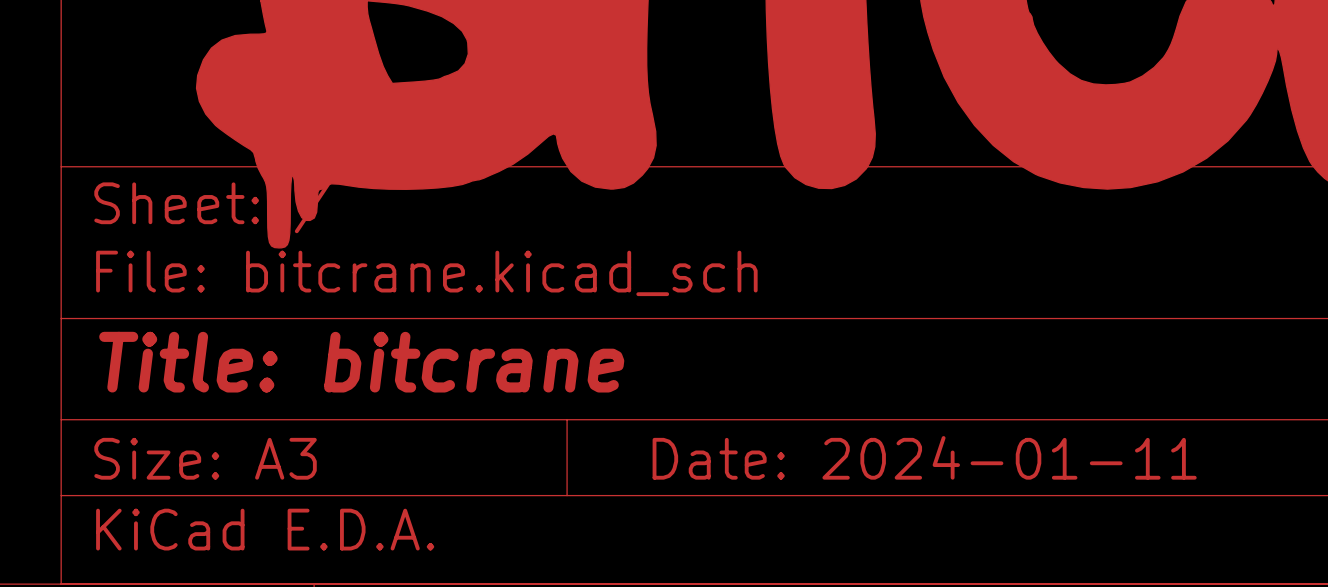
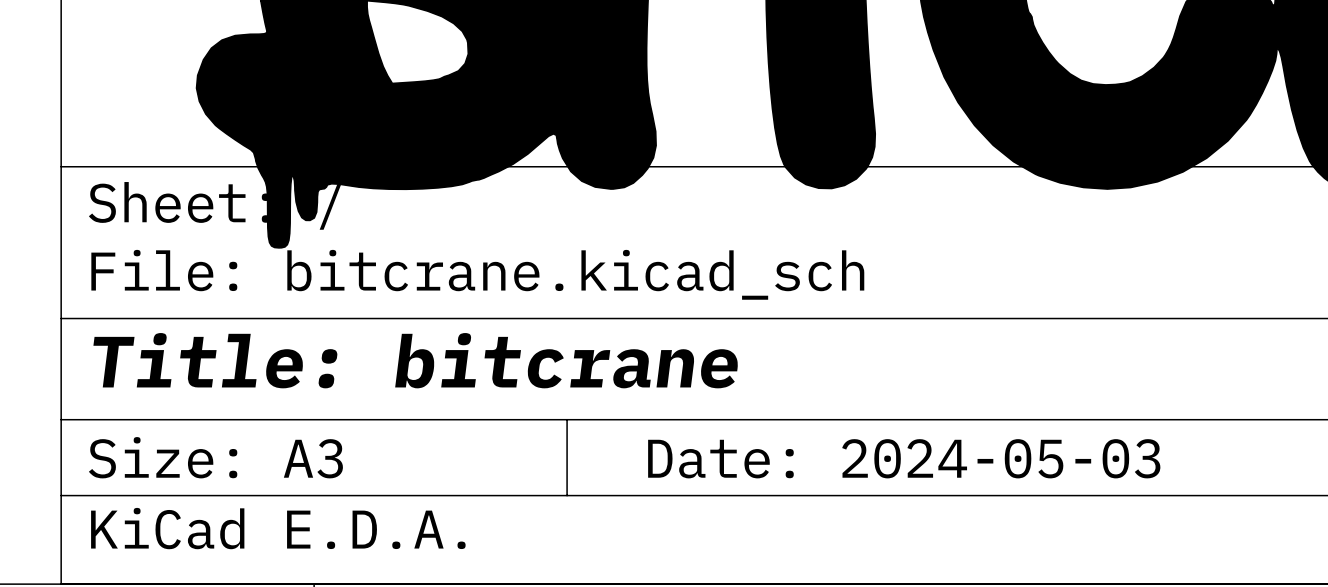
title block: Date: 2024-01-11 (924, 457) -> Date: 2024-05-03 (904, 458)

